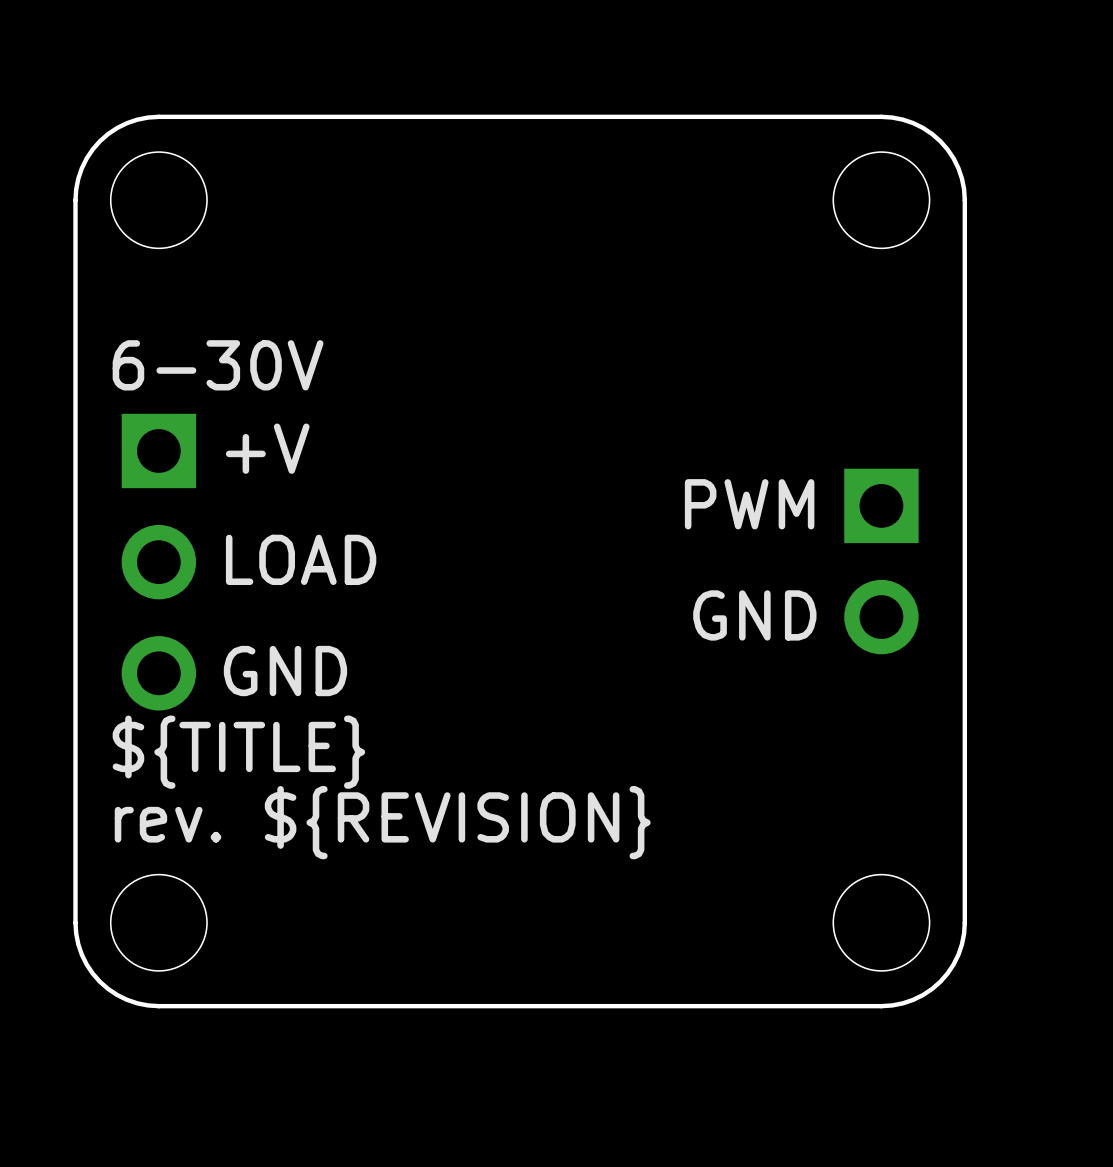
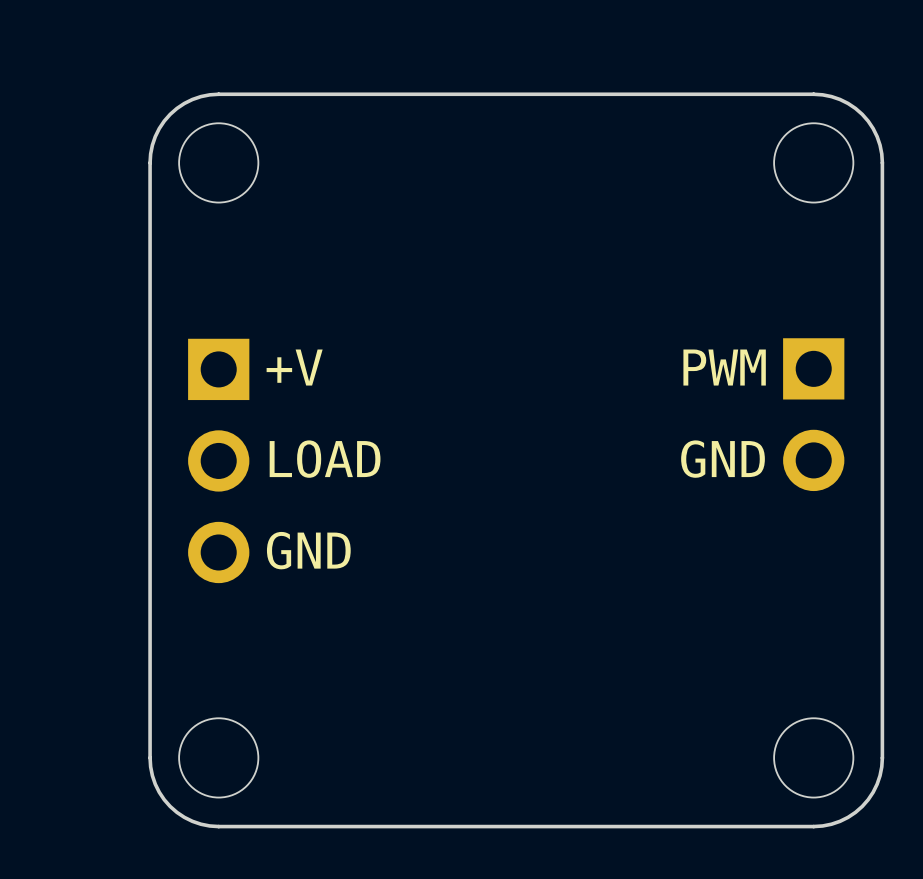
text: 6-30V (218, 365) -> none
text position: PWM (749, 504) -> PWM (724, 367)
part position: (881, 561) -> (813, 414)
text position: GND (754, 615) -> GND (723, 459)
text: ${TITLE} (238, 752) -> none
text: rev. ${REVISION} (382, 822) -> none

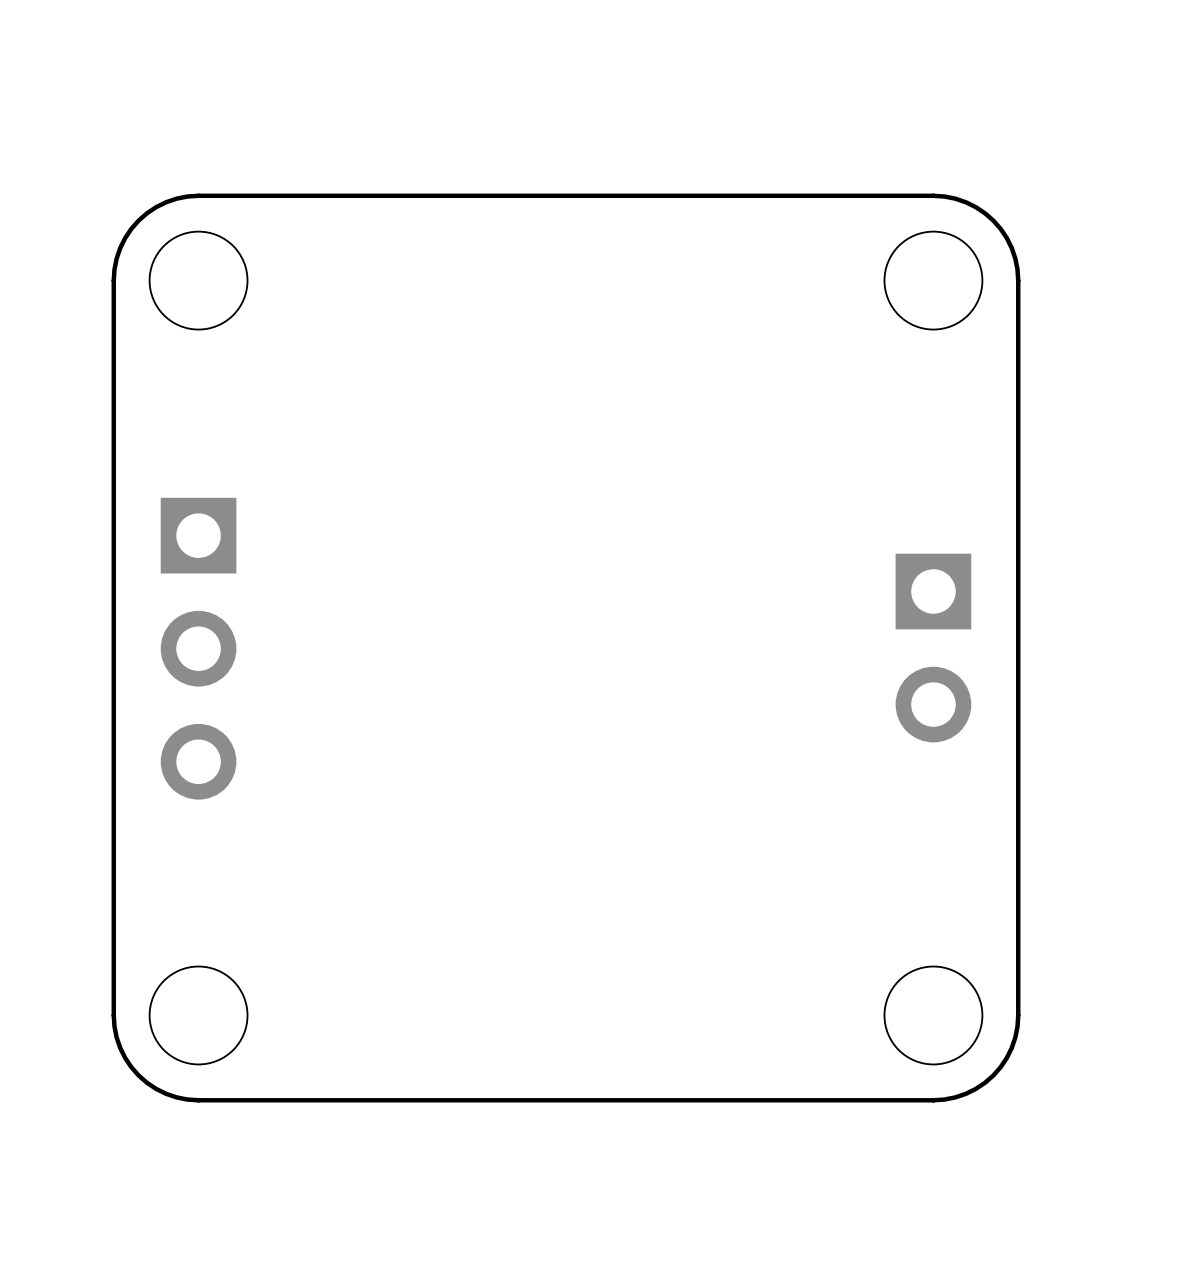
text: +V (294, 367) -> none
text: PWM (724, 367) -> none
part position: (813, 414) -> (933, 648)
text: LOAD (325, 459) -> none
text: GND (723, 459) -> none
text: GND (308, 550) -> none

